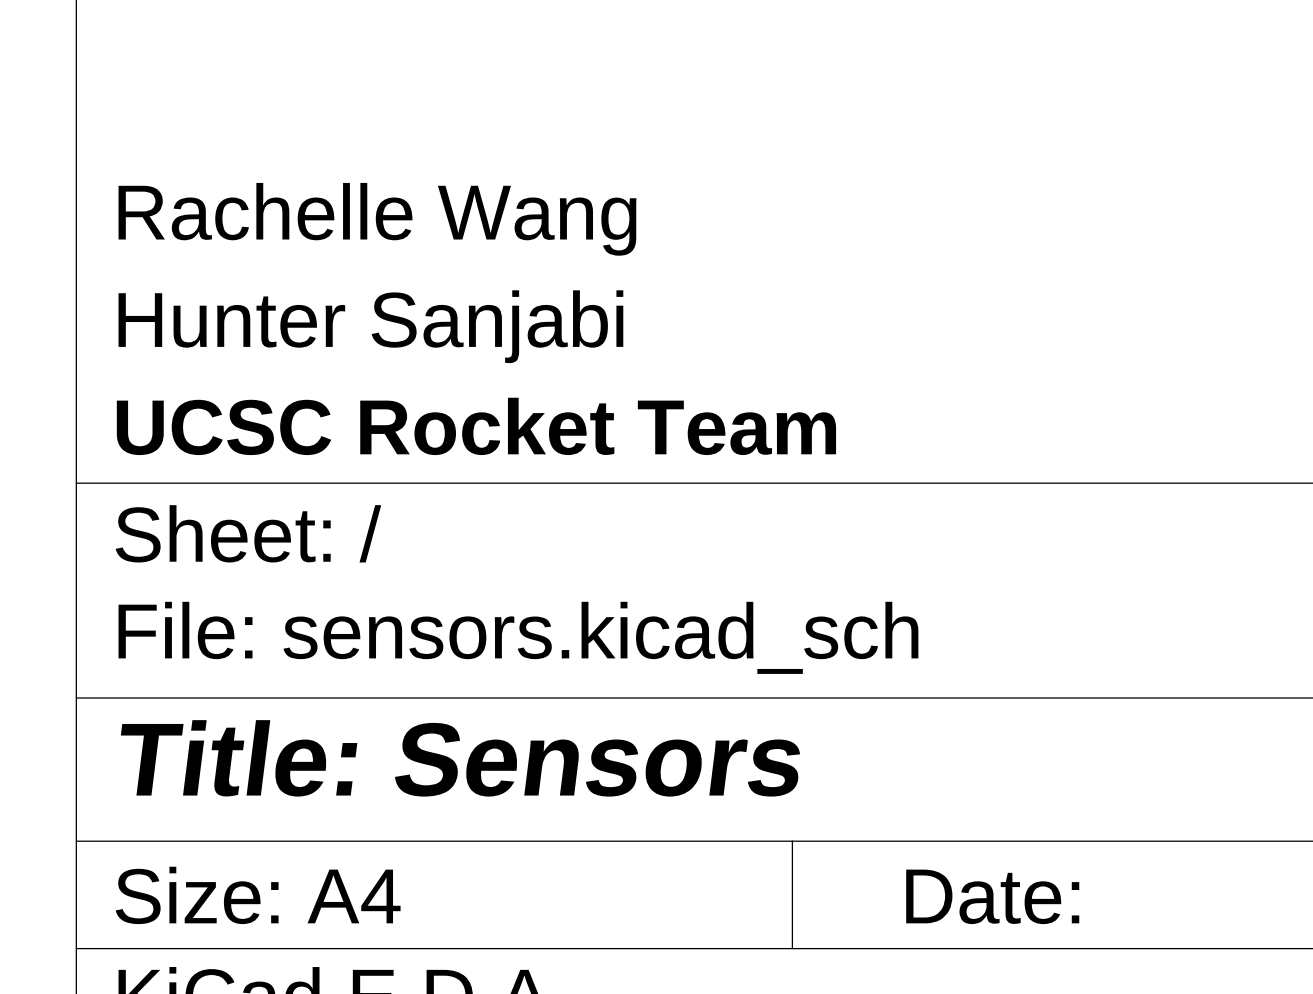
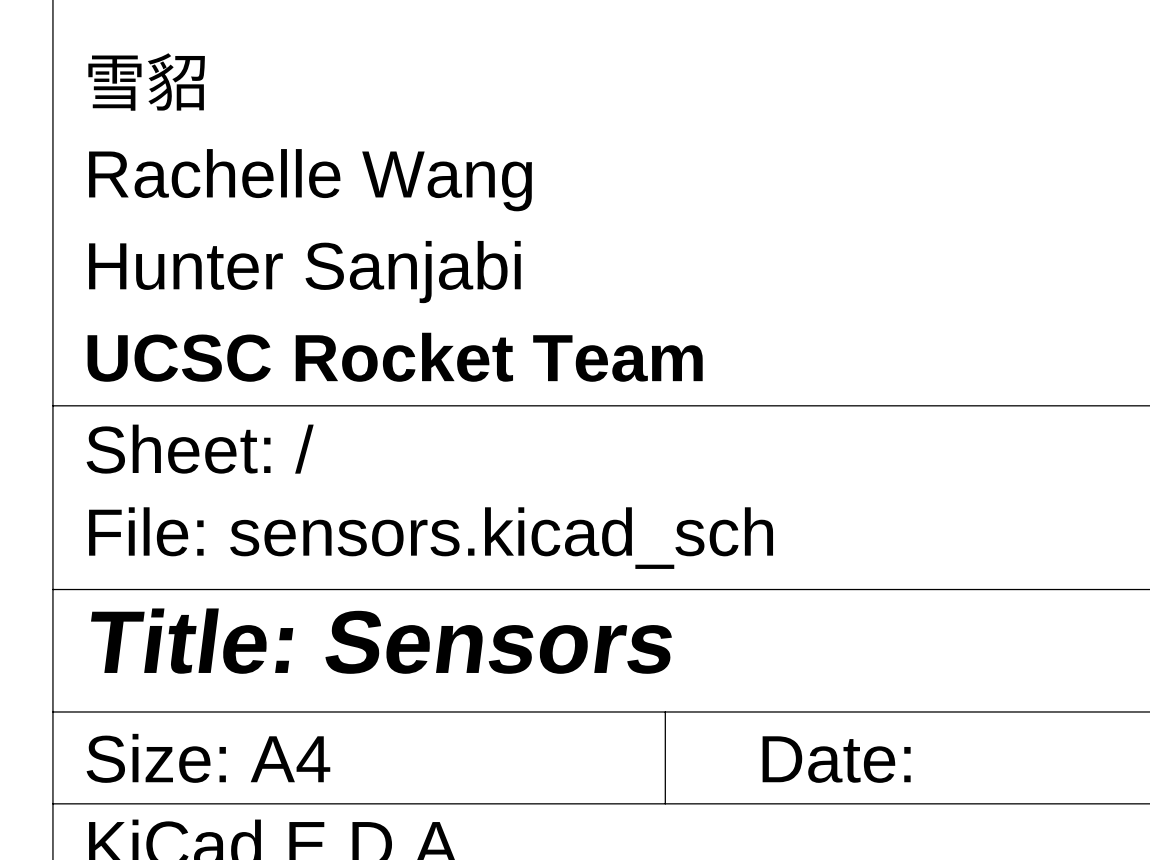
title block: none -> 雪貂 (146, 81)

